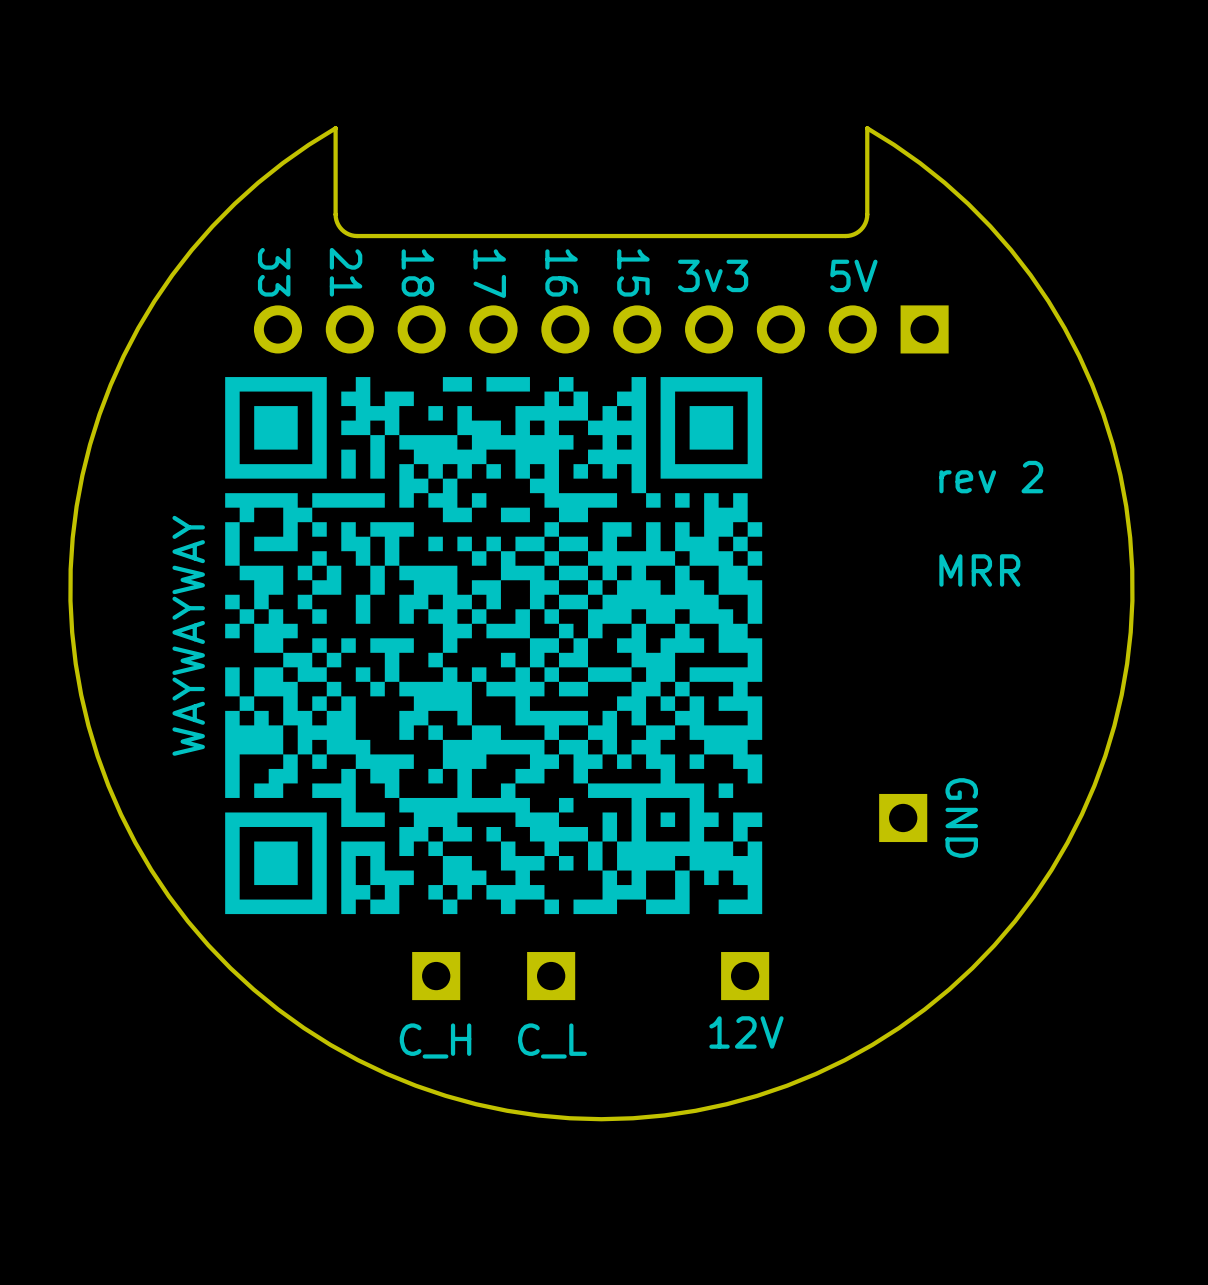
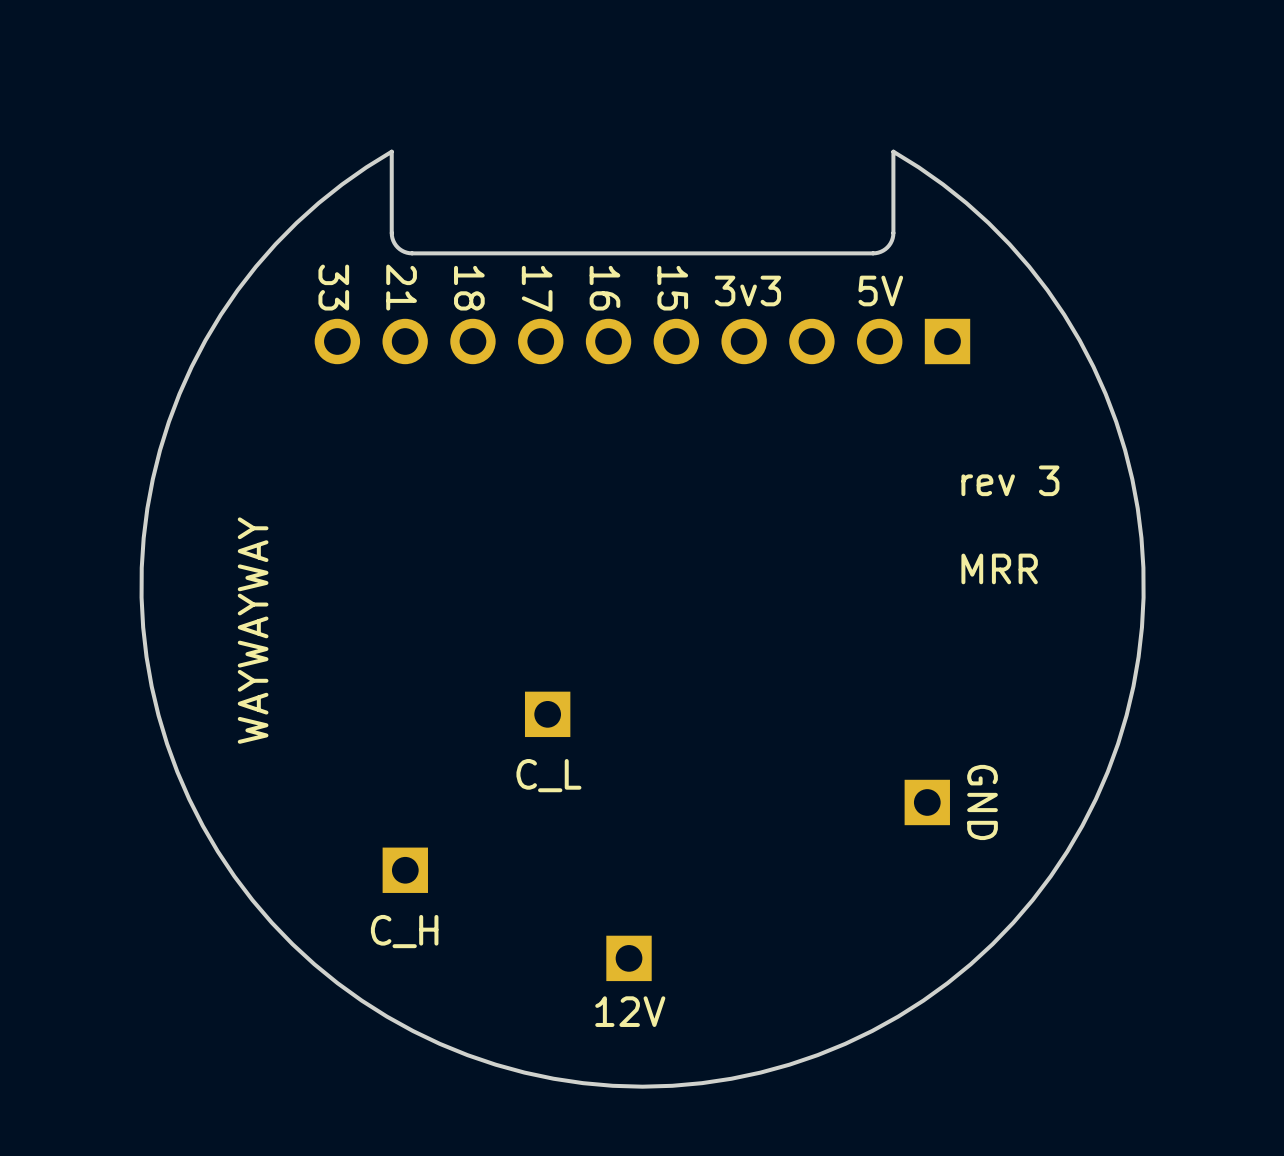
drawing: [225, 377, 763, 915] -> none
text: rev 2 (991, 477) -> rev 3 (1010, 480)
part position: (436, 976) -> (405, 870)
part position: (551, 976) -> (547, 714)
part position: (745, 976) -> (629, 958)

